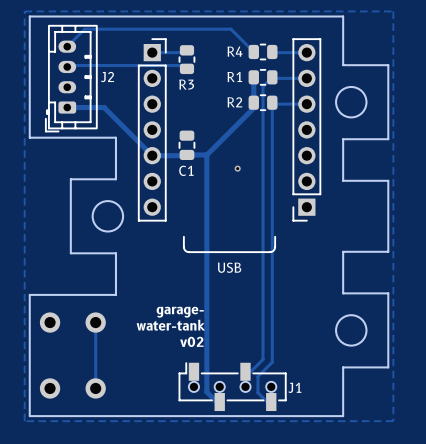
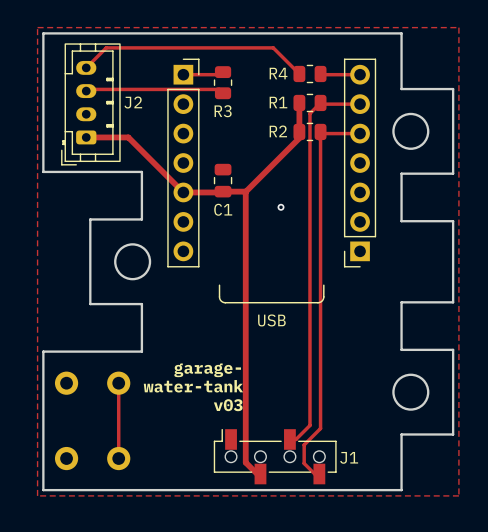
text: v02 (191, 341) -> v03 (228, 405)

